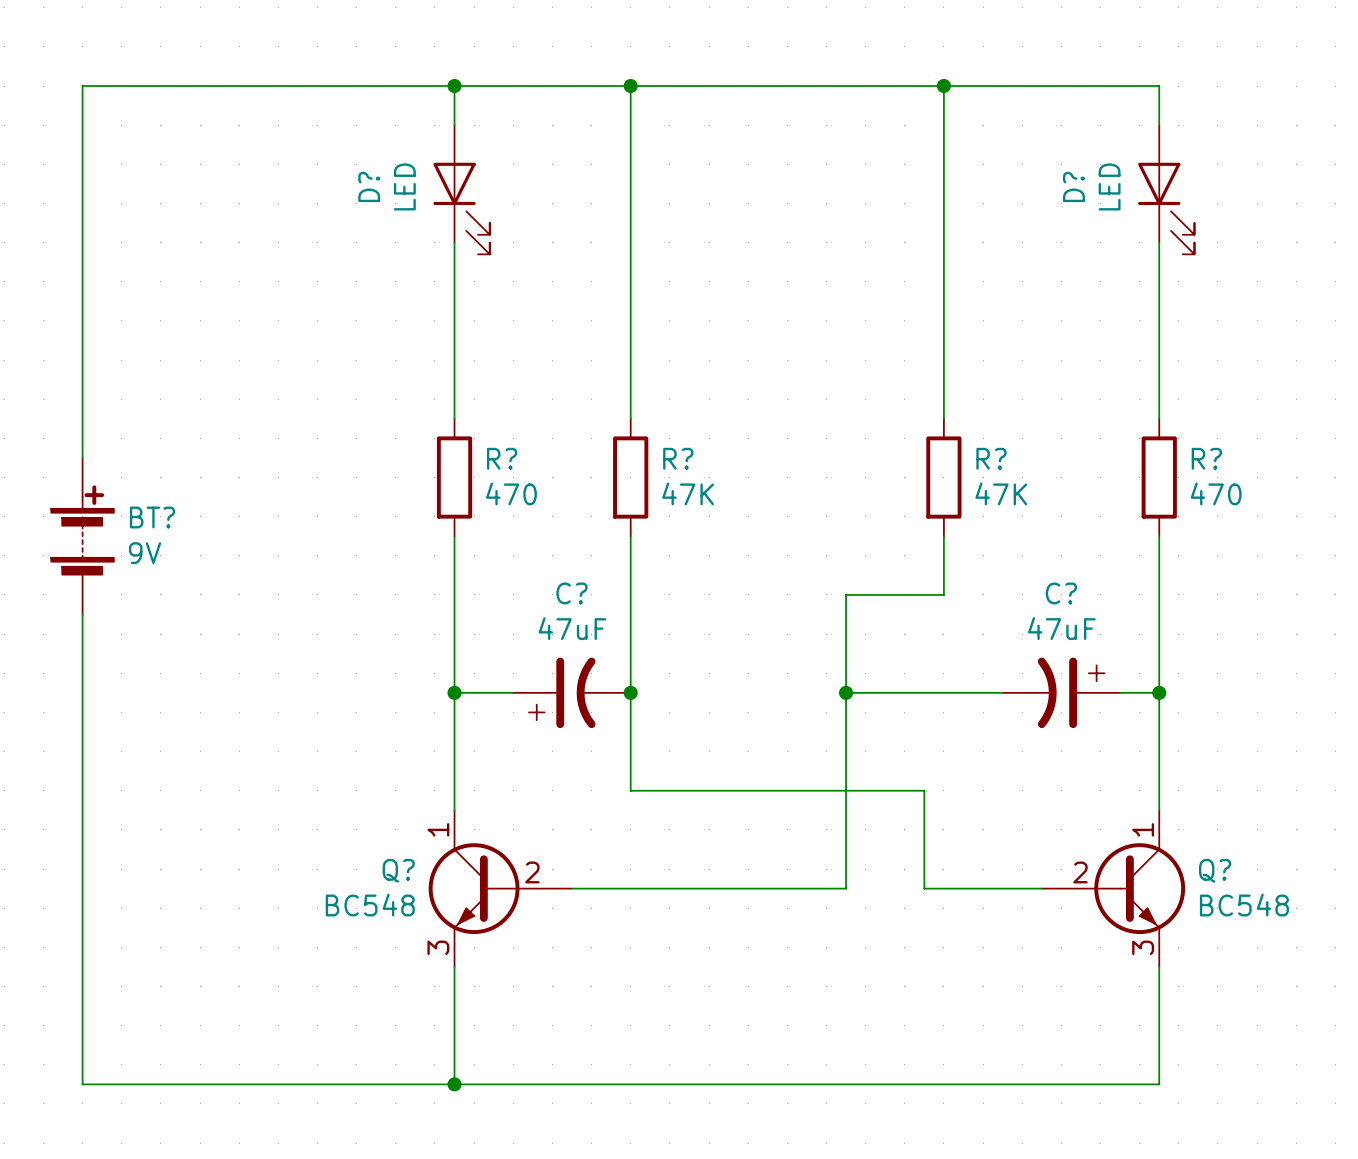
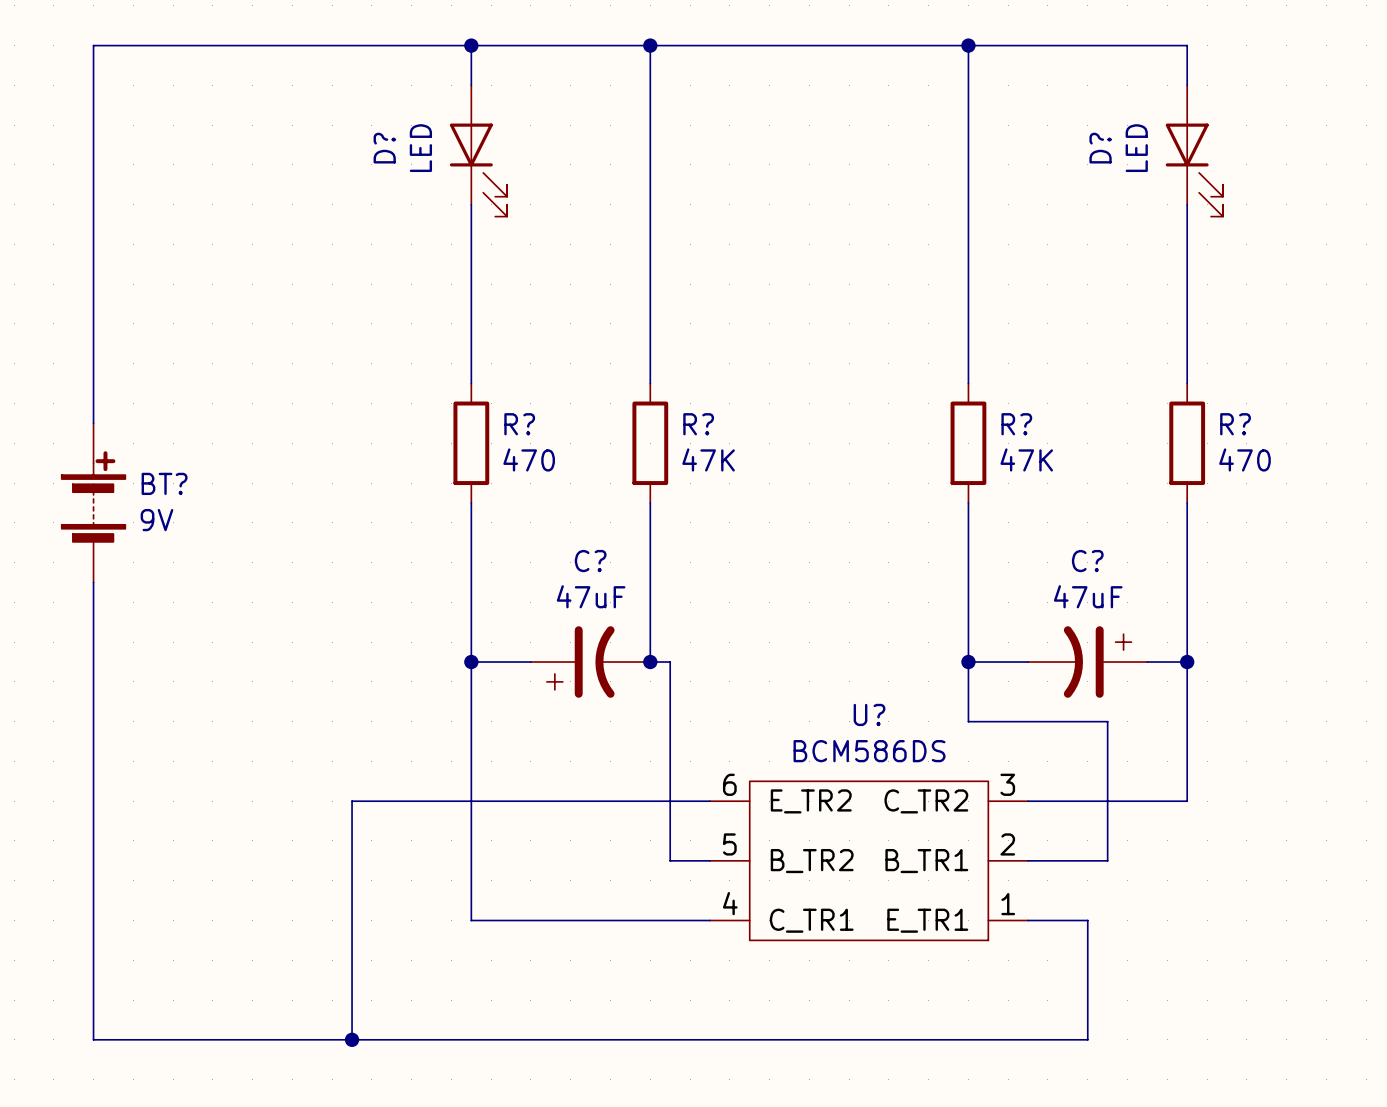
wire: (943, 594) (846, 594) (846, 888) (689, 888) -> (968, 562) (968, 721) (1107, 721) (1107, 860) (1067, 860)
wire: (630, 692) (630, 790) (924, 790) (924, 888) (1002, 888) -> none
wire: (846, 692) (943, 692) -> none
junction: (846, 692) -> none
junction: none -> (968, 662)
wire: none -> (471, 781) (471, 920) (709, 920)
wire: none -> (1187, 781) (1187, 801) (1028, 801)
wire: none -> (709, 801) (352, 801) (352, 1039)
Q?: BC548 (500, 888) -> none
wire: (571, 888) (650, 888) -> (650, 662) (670, 662) (670, 860)
U?: none -> BCM586DS (869, 860)
Q?: BC548 (1113, 888) -> none
wire: (454, 966) (454, 1084) -> none
wire: (1159, 966) (1159, 1084) (82, 1084) (82, 1064) -> (1028, 920) (1087, 920) (1087, 1039) (93, 1039)
junction: none -> (352, 1039)
junction: (454, 1084) -> none

